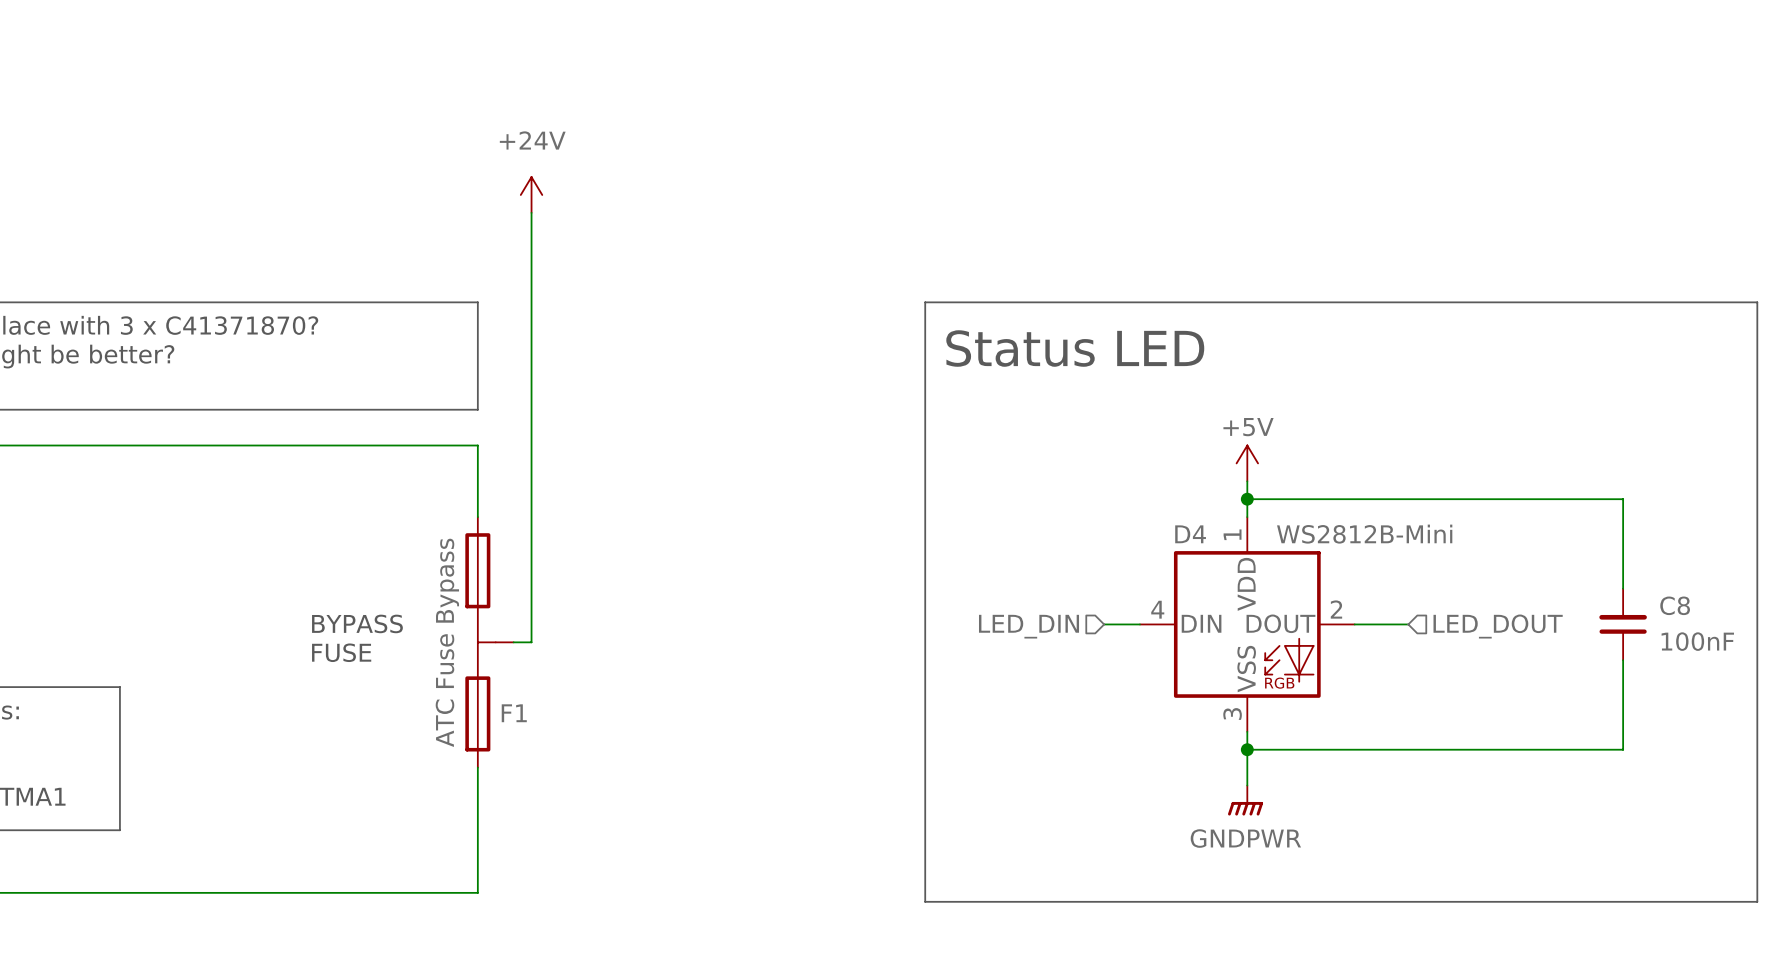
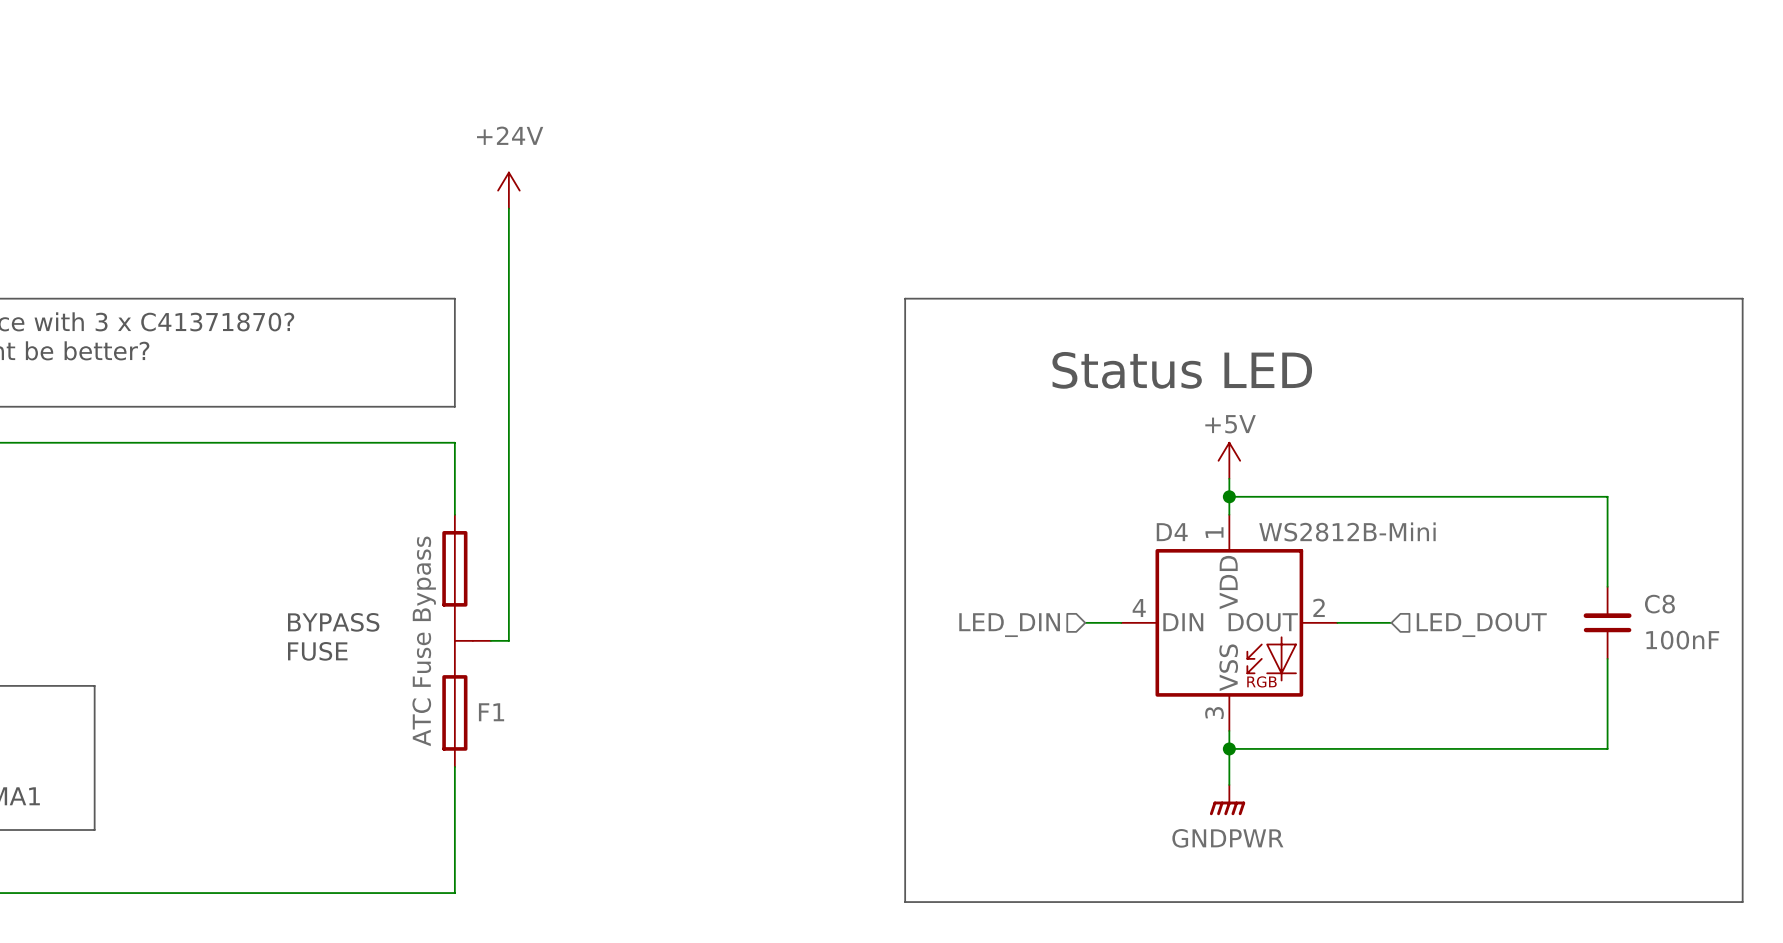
text position: Status LED (1075, 348) -> Status LED (1182, 370)

